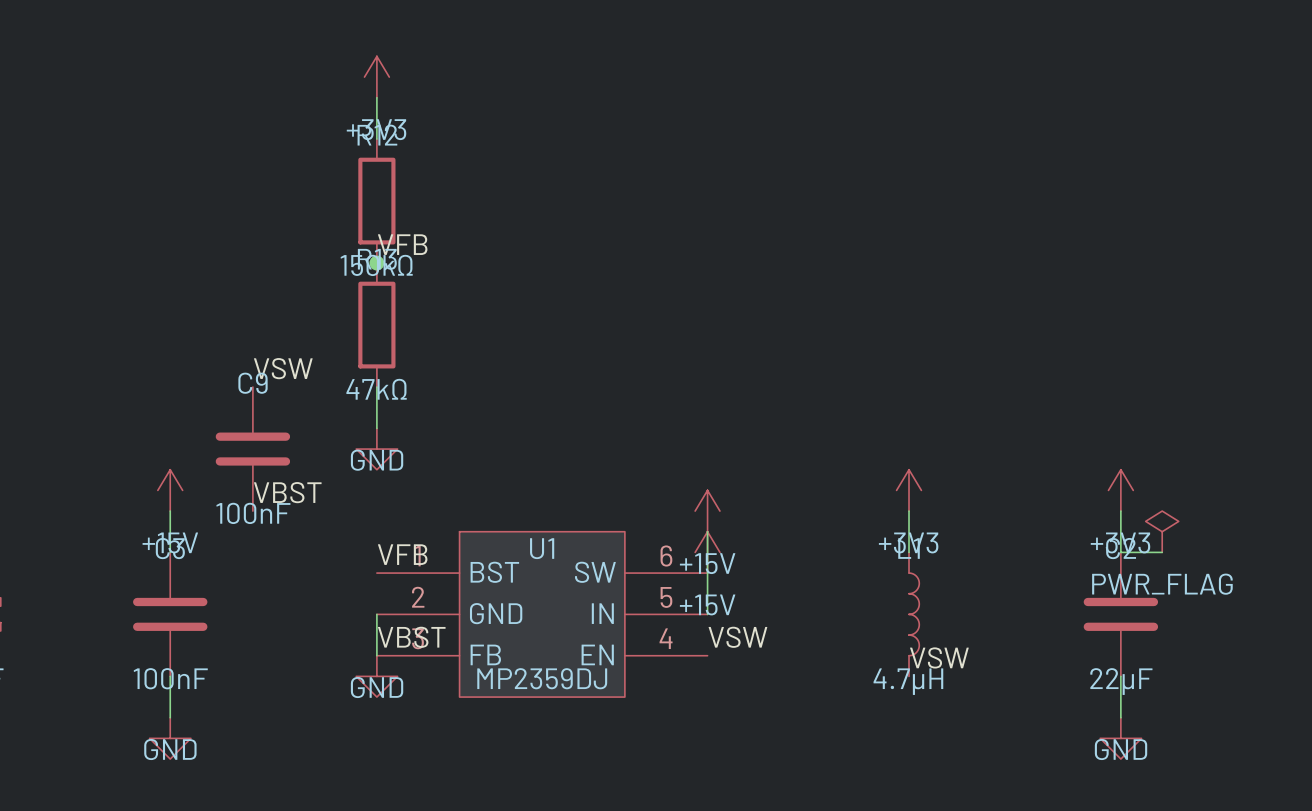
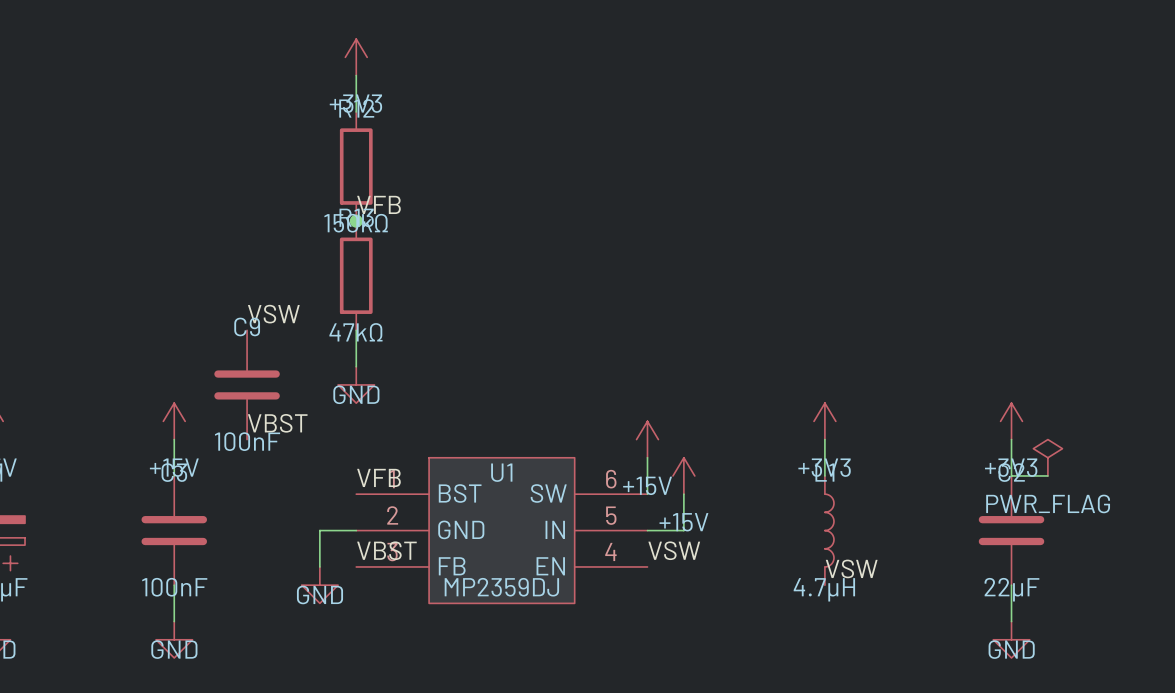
power symbol position: +15V (707, 552) -> +15V (683, 475)
wire: (707, 573) (707, 614) -> (683, 494) (683, 530) (647, 530)
wire: (376, 614) (376, 655) -> (356, 530) (319, 530) (319, 566)
power symbol position: GND (376, 676) -> GND (319, 585)

